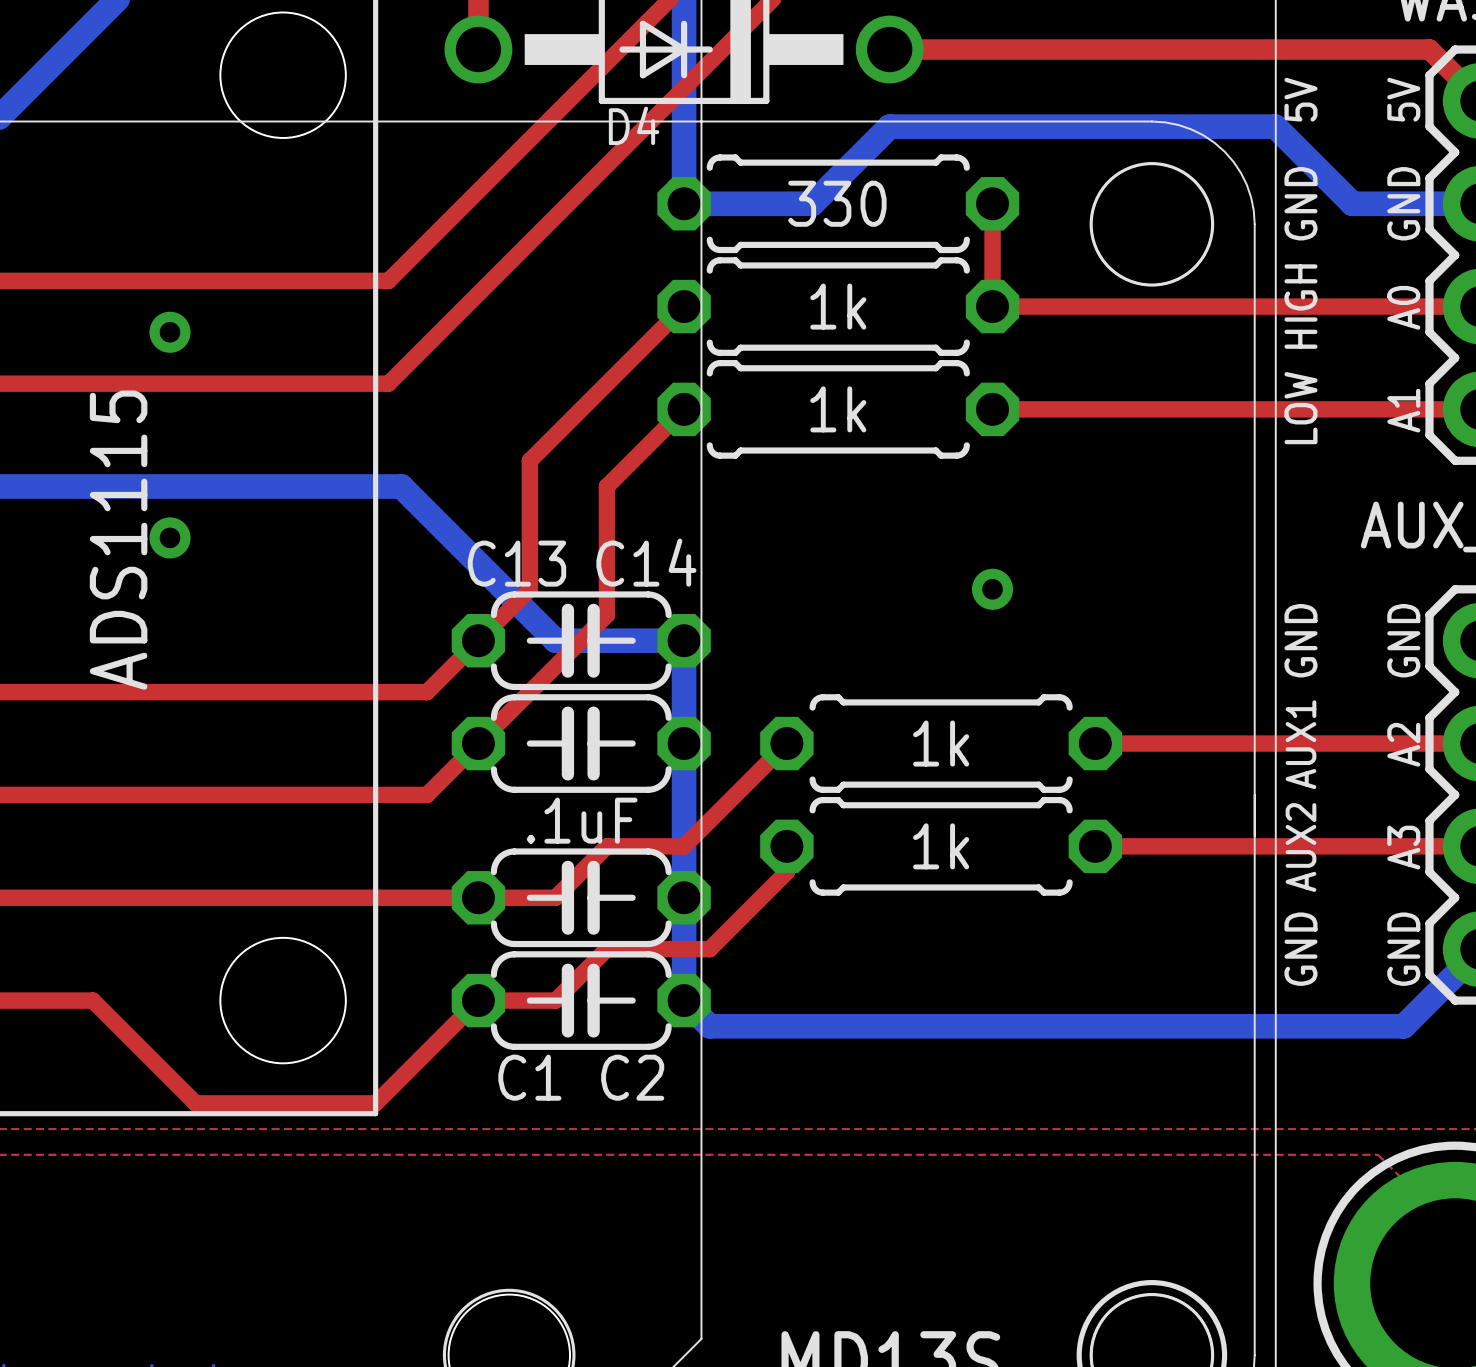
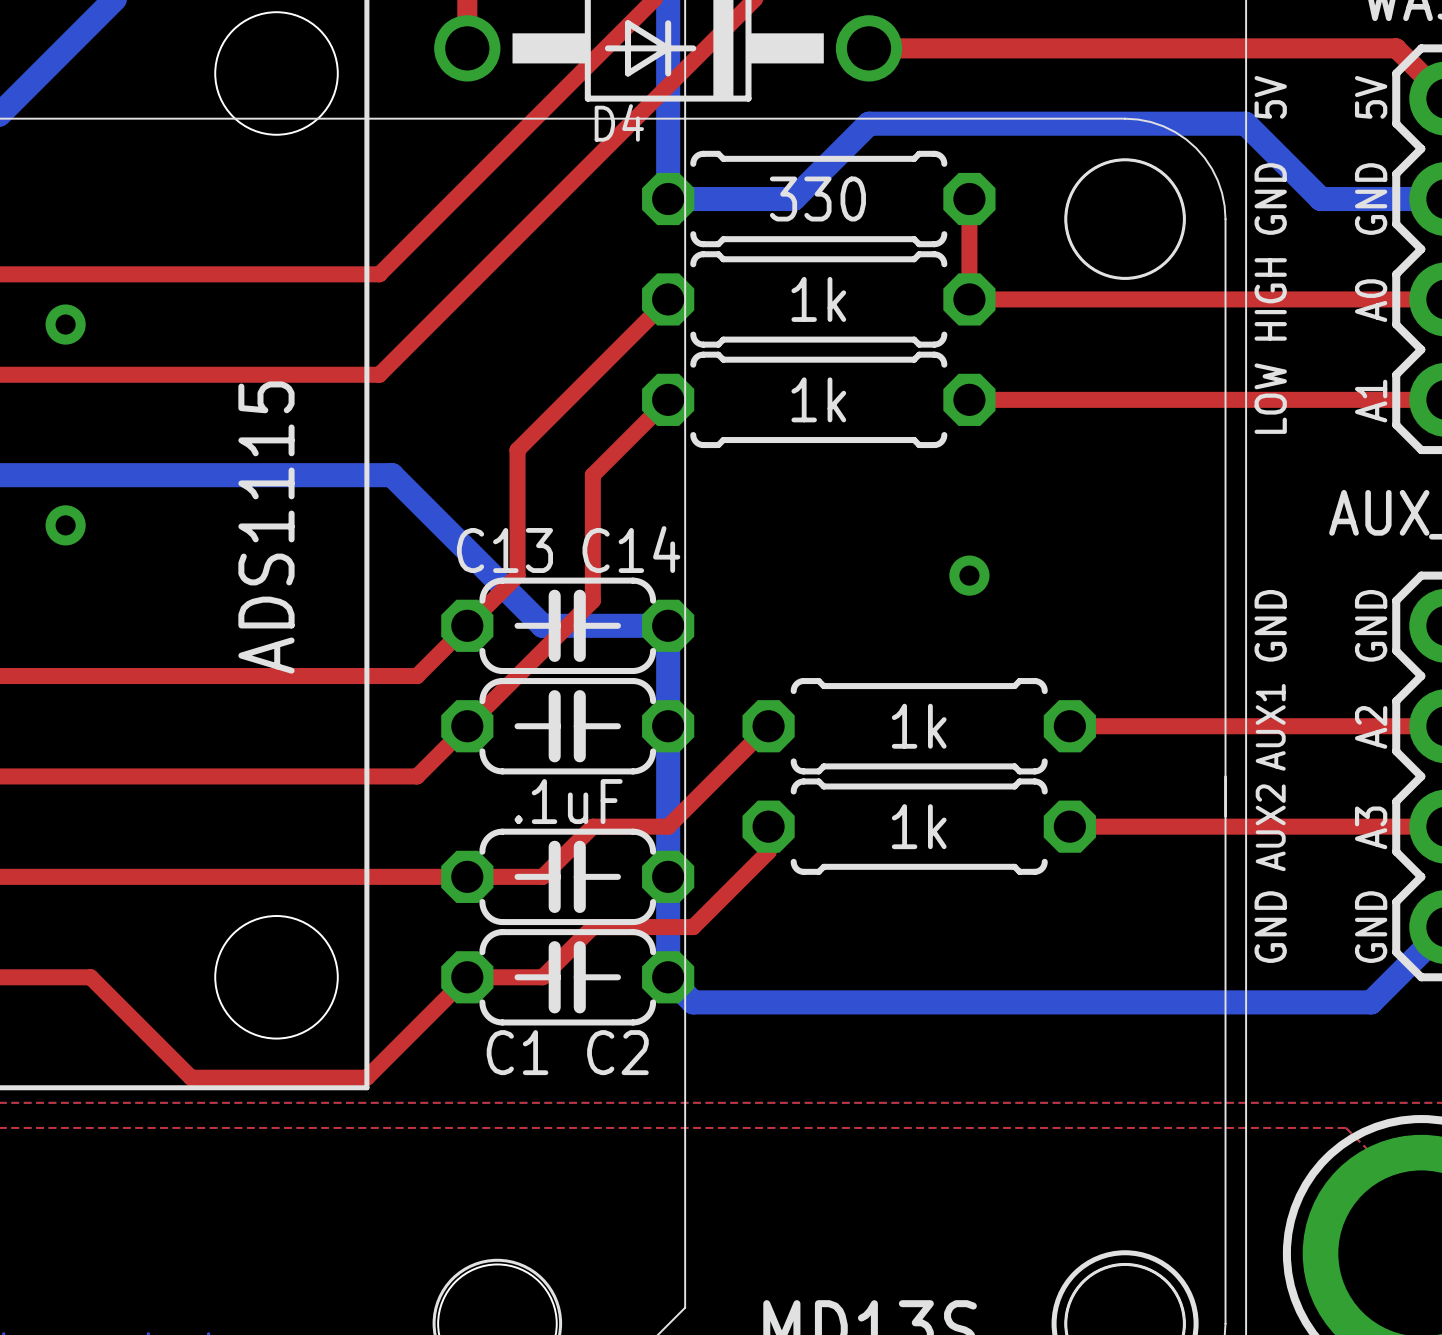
via position: (170, 332) -> (65, 324)
via position: (170, 537) -> (65, 525)
part value position: ADS1115 (118, 540) -> ADS1115 (266, 527)

